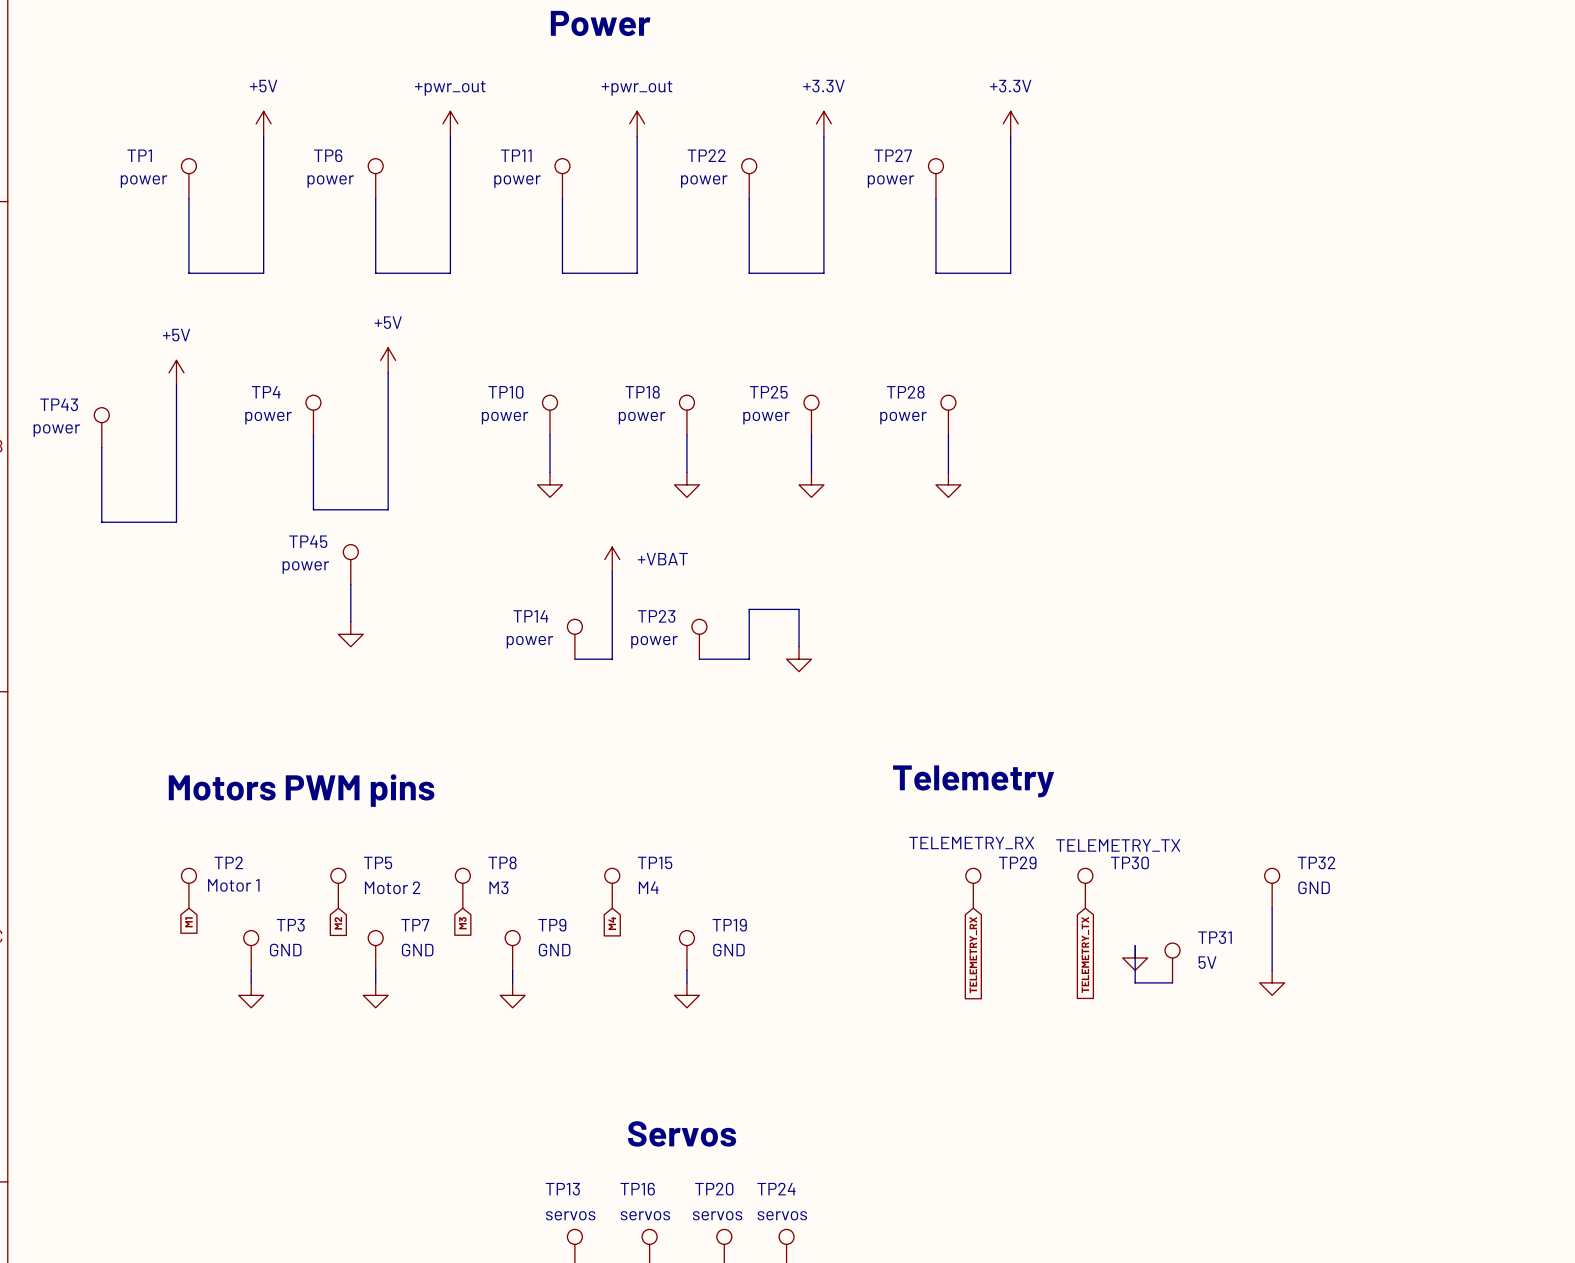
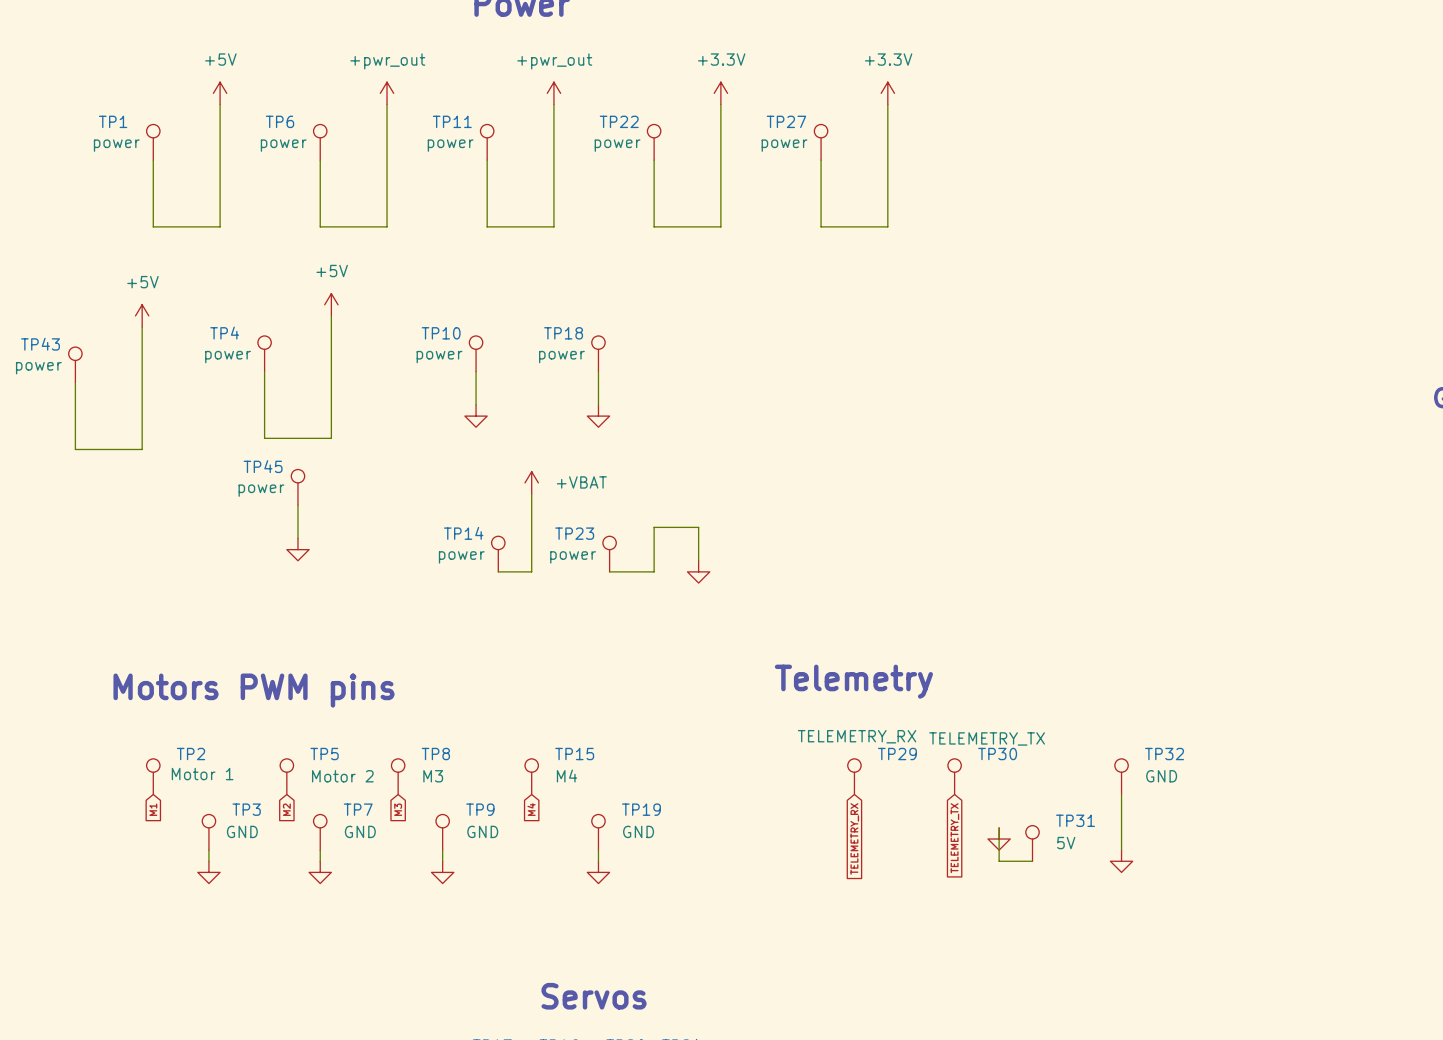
TP25: power (811, 415) -> none
TP28: power (948, 415) -> none
wire: (811, 435) (811, 472) -> none
wire: (948, 435) (948, 472) -> none
power symbol: (811, 484) -> none
power symbol: (948, 484) -> none

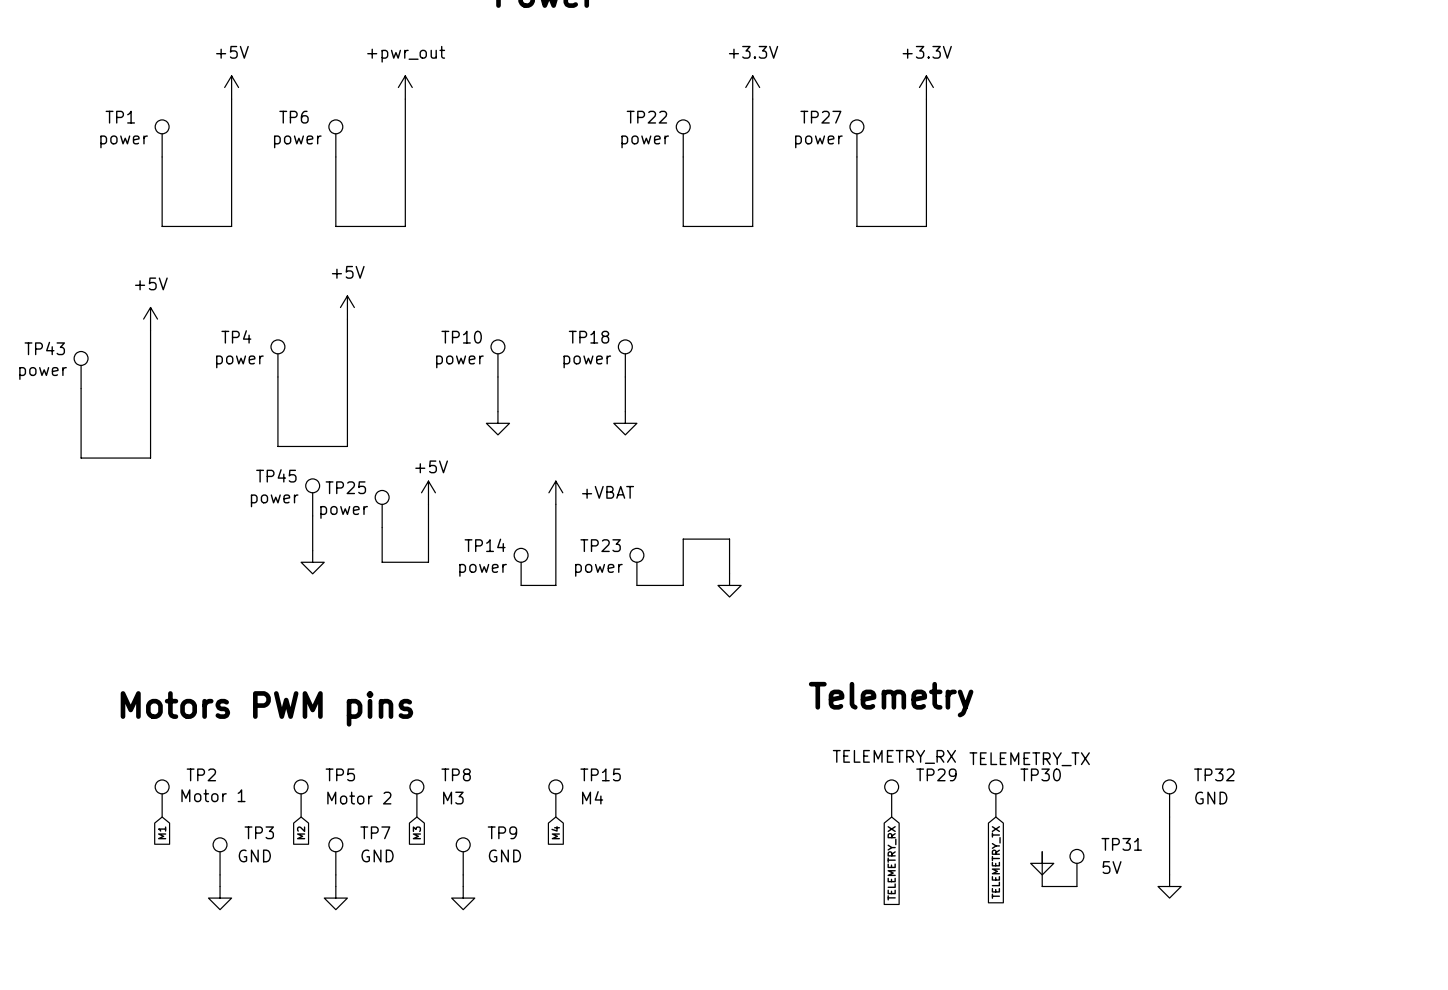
power symbol: +pwr_out (553, 93) -> none
wire: (553, 104) (553, 226) (487, 226) (487, 160) -> none
TP11: power (487, 142) -> none
power symbol: none -> +5V (428, 492)
wire: none -> (428, 504) (428, 562) (382, 562) (382, 527)
TP25: none -> power (382, 508)
TP19: GND (598, 832) -> none
wire: (598, 850) (598, 861) -> none
power symbol: (598, 872) -> none

